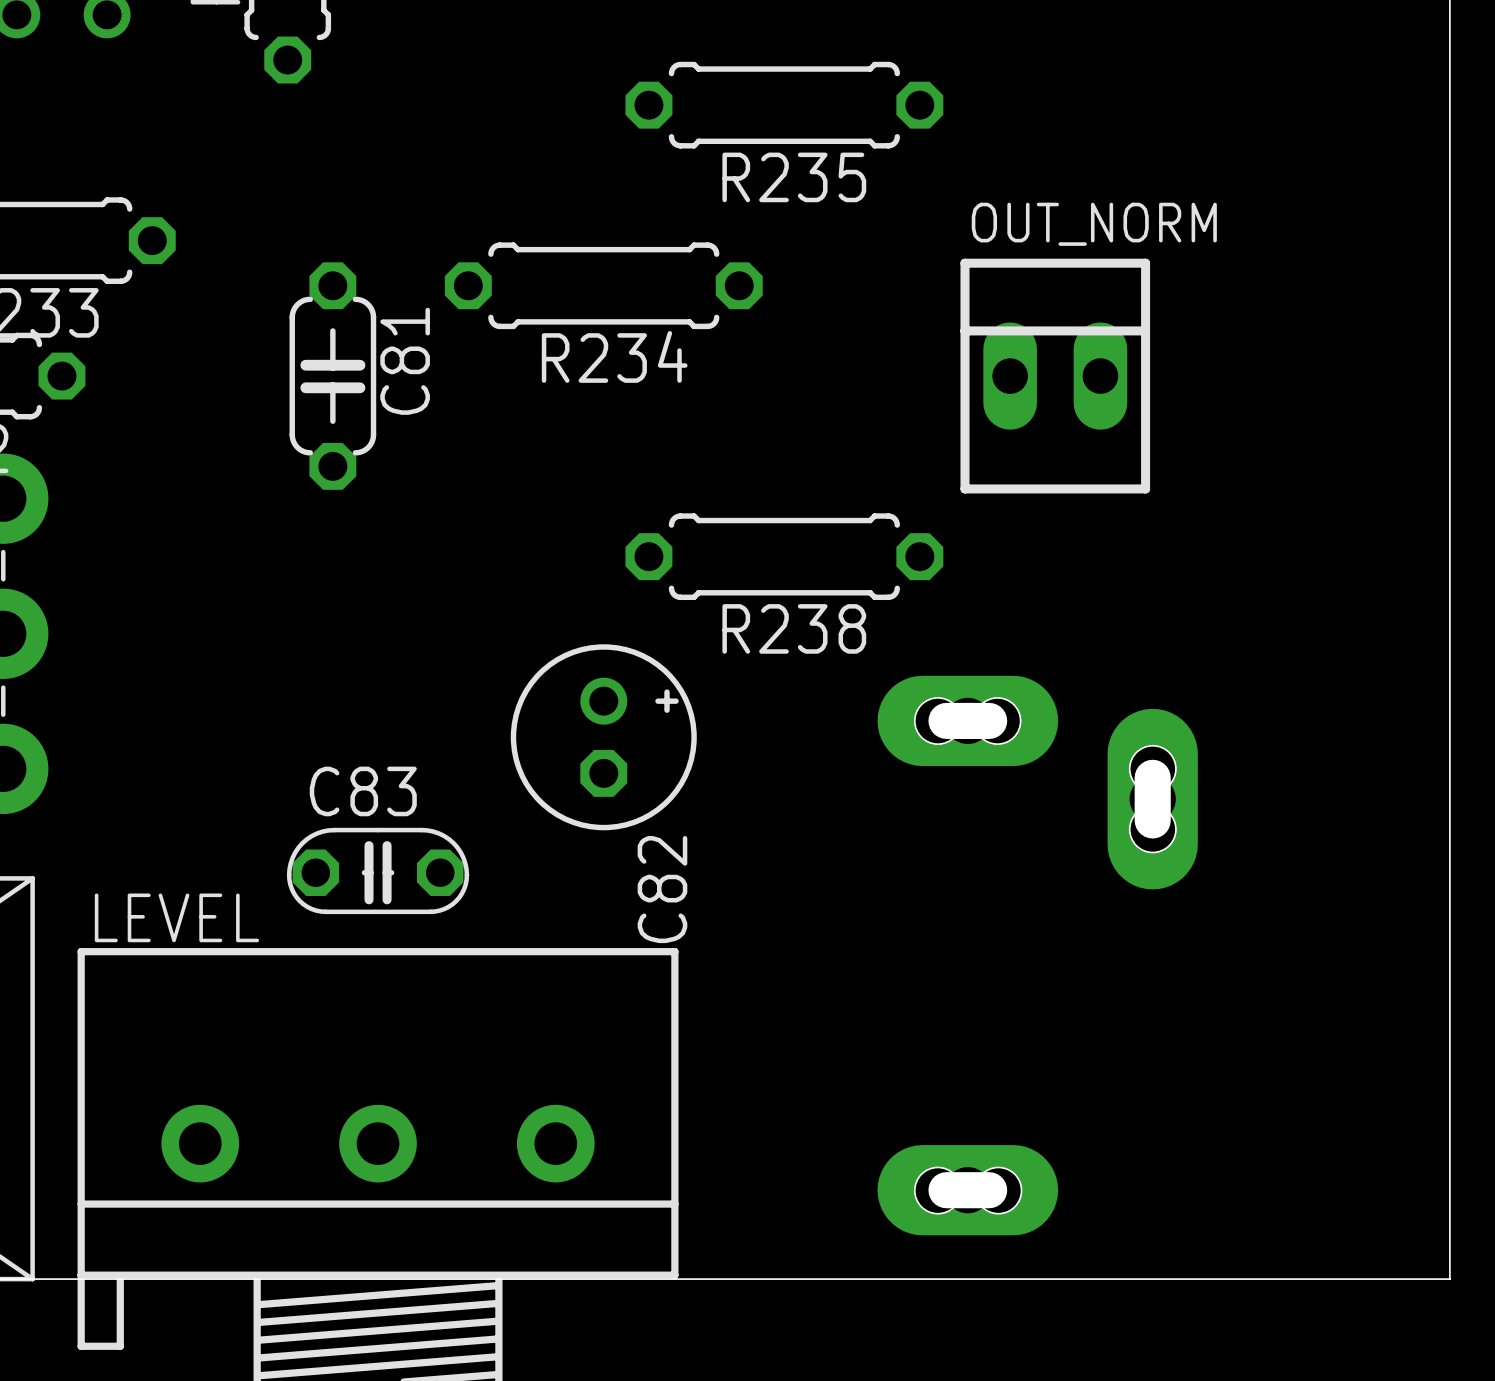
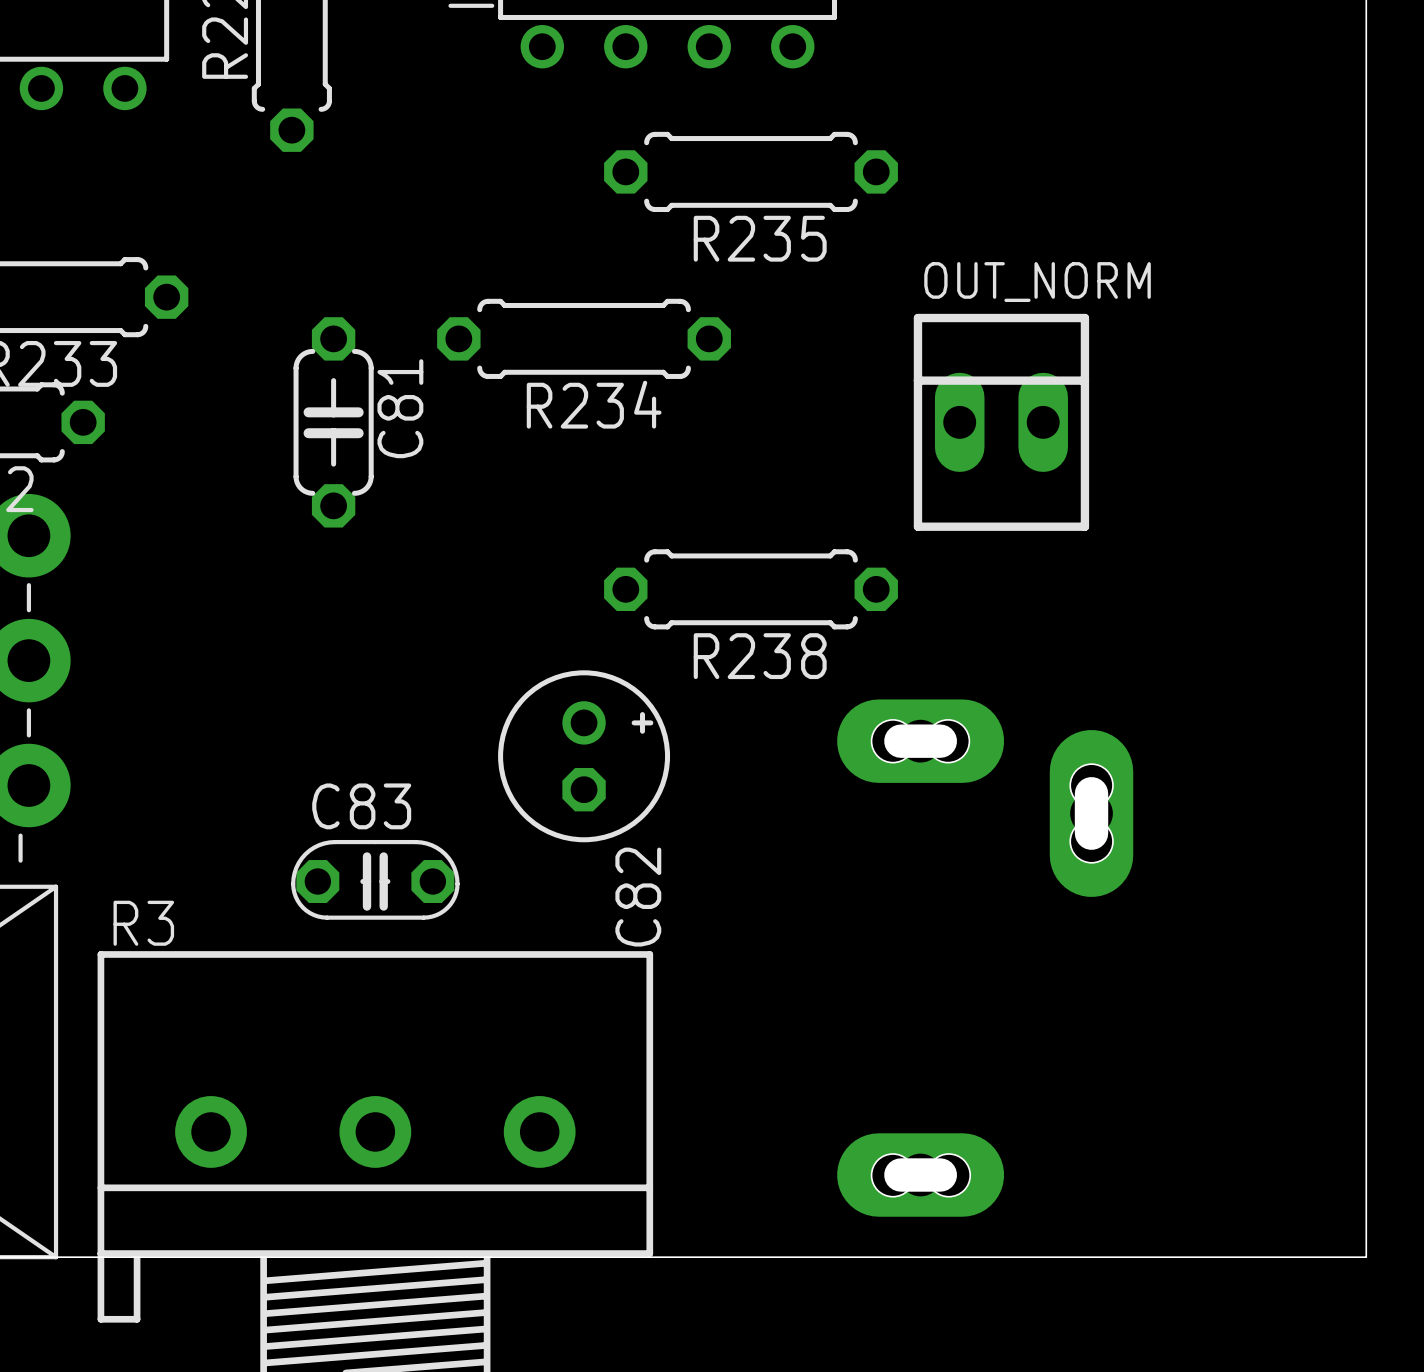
LEVEL name: LEVEL (176, 917) -> R3 (143, 923)

